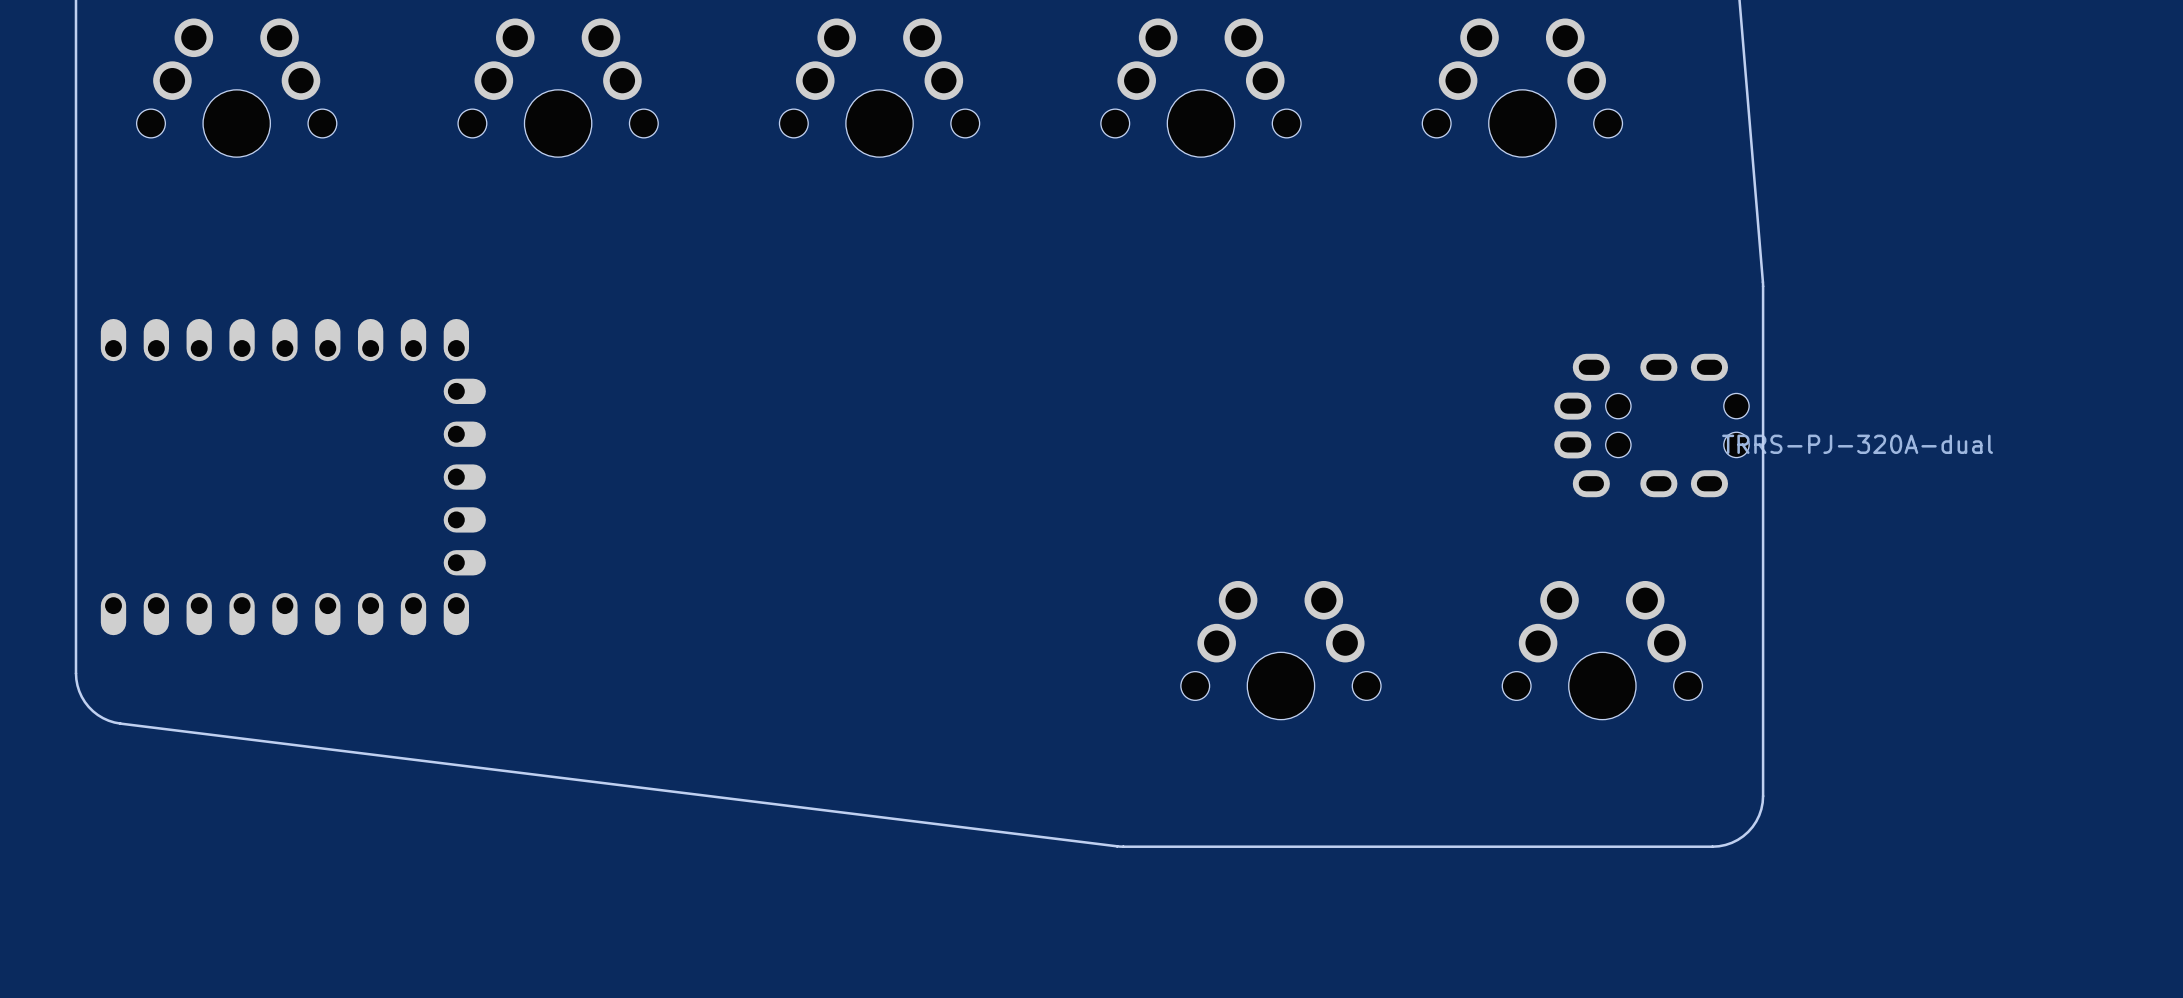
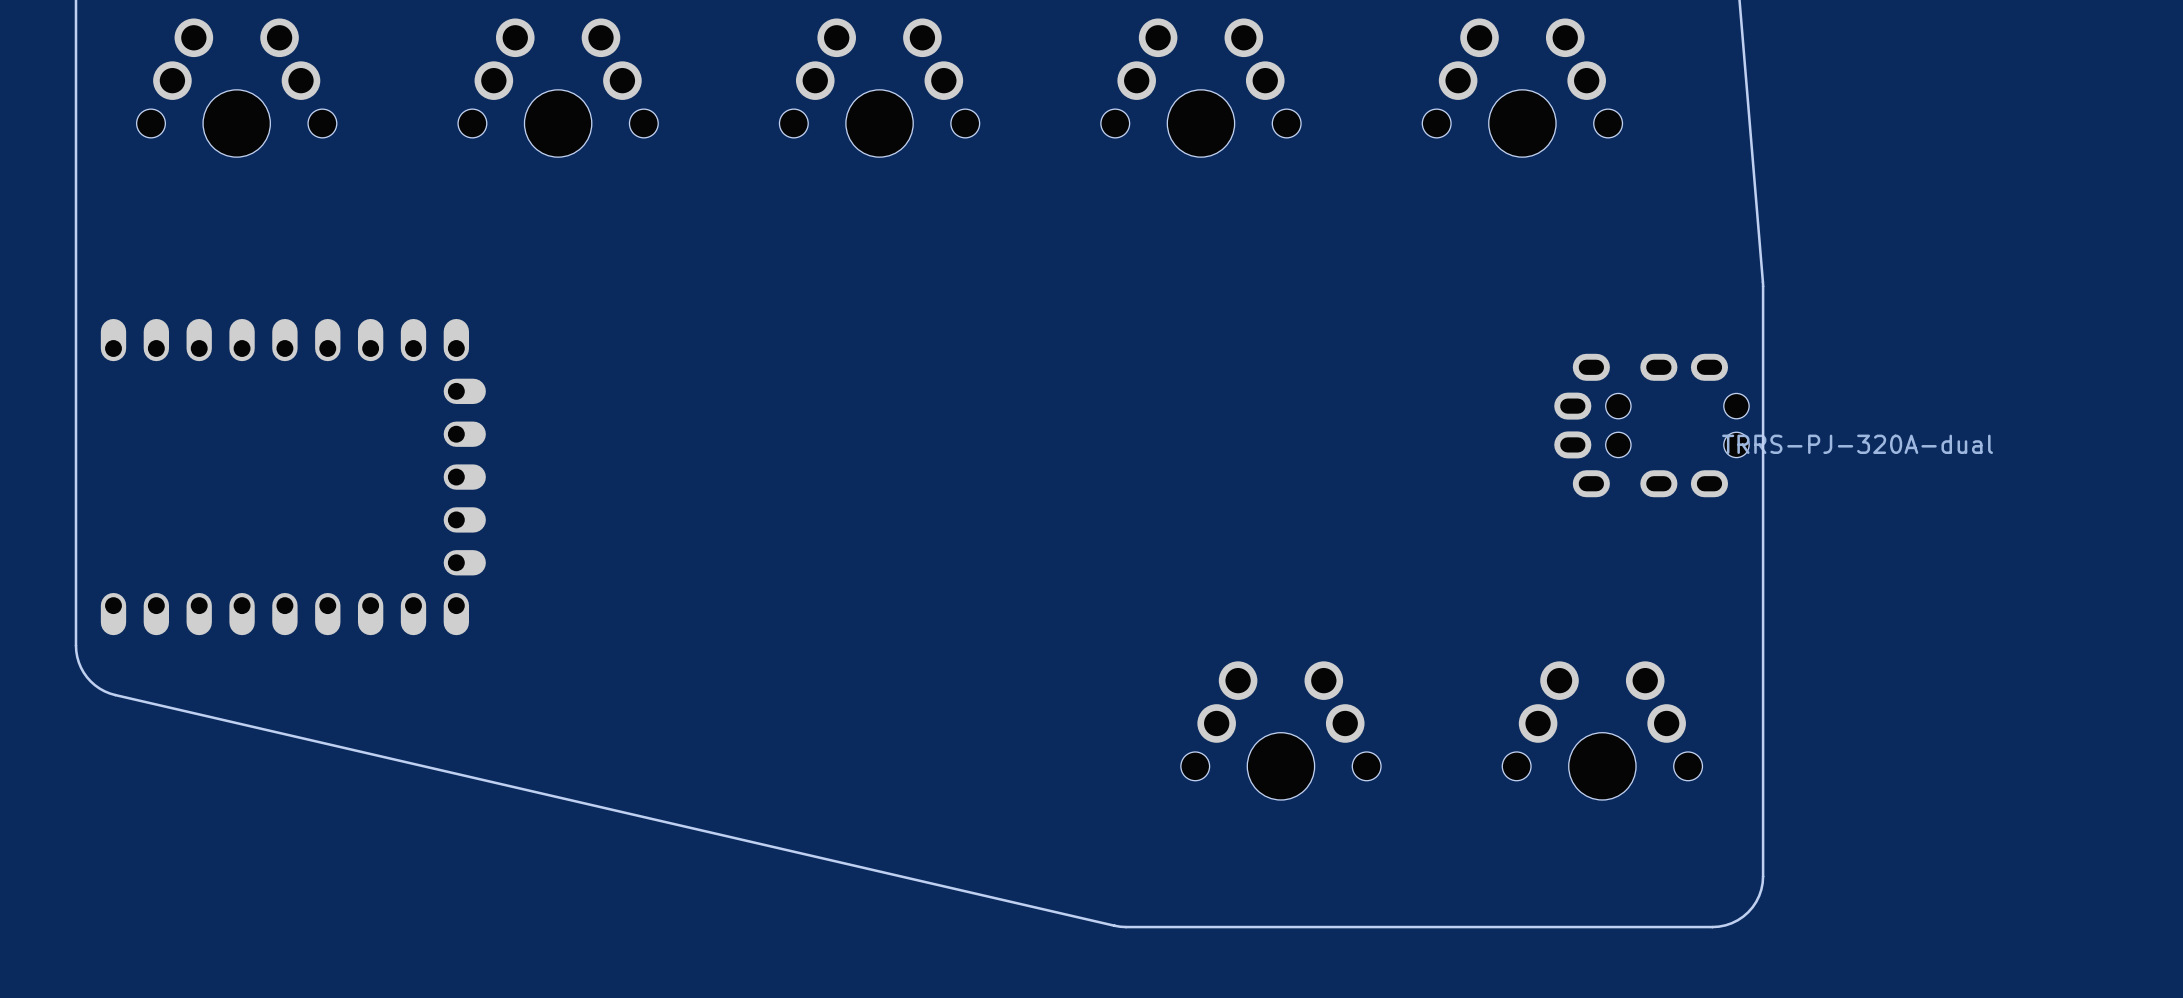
board edge: (75, 645) (76, 679) (81, 696) (97, 714) (114, 722) (1120, 846) (1719, 846) (1737, 839) (1752, 826) (1759, 815) (1763, 796) -> (75, 645) (78, 662) (87, 677) (99, 688) (115, 695) (1120, 926) (1712, 927) (1725, 925) (1737, 920) (1748, 912) (1756, 901) (1761, 889) (1763, 796)
part position: (1280, 650) -> (1280, 730)
part position: (1602, 650) -> (1602, 730)

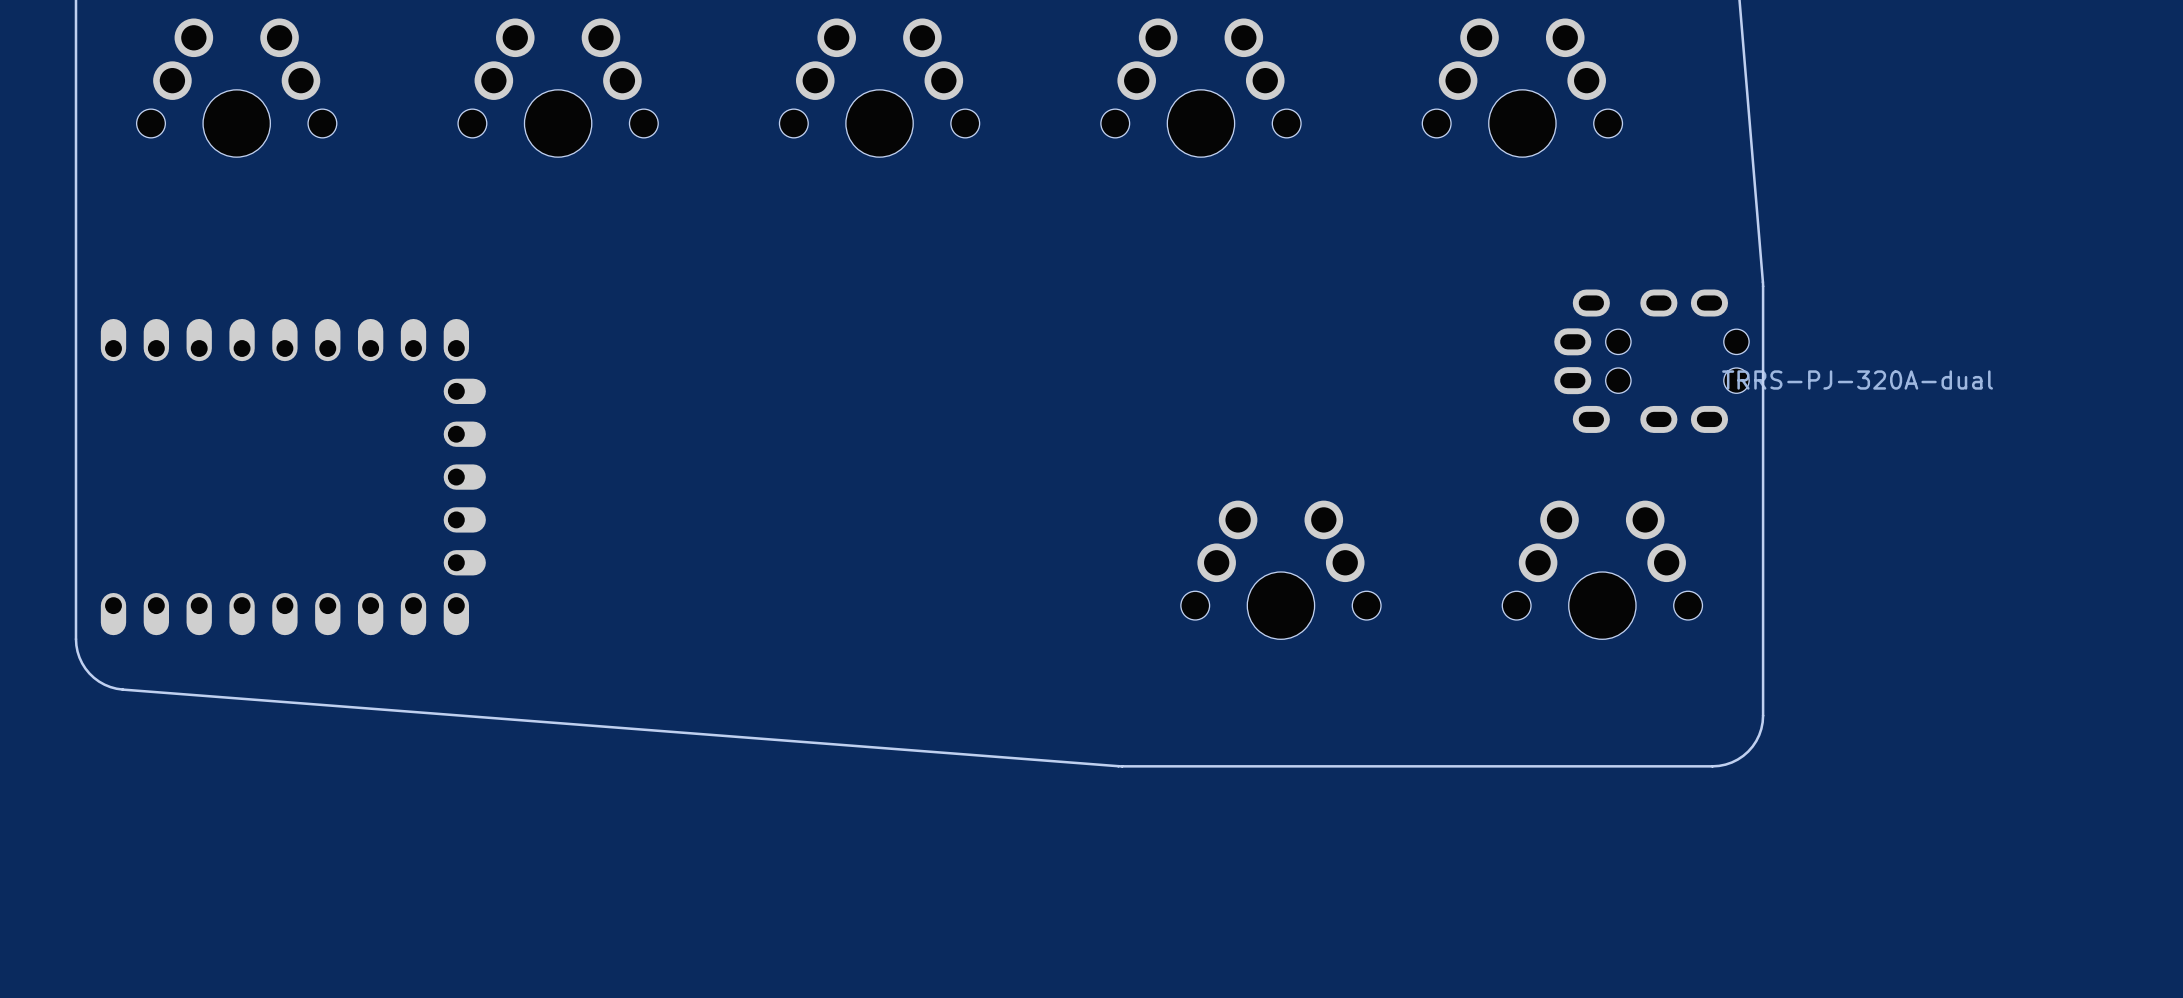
part position: (1651, 425) -> (1651, 361)
board edge: (75, 639) (77, 656) (83, 672) (99, 688) (115, 695) (1126, 927) (1712, 927) (1725, 925) (1743, 916) (1752, 907) (1759, 895) (1762, 883) (1763, 715) -> (75, 639) (79, 657) (89, 673) (104, 684) (122, 689) (1120, 766) (1719, 765) (1737, 759) (1752, 746) (1759, 735) (1763, 715)
part position: (1280, 730) -> (1280, 569)
part position: (1602, 730) -> (1602, 569)

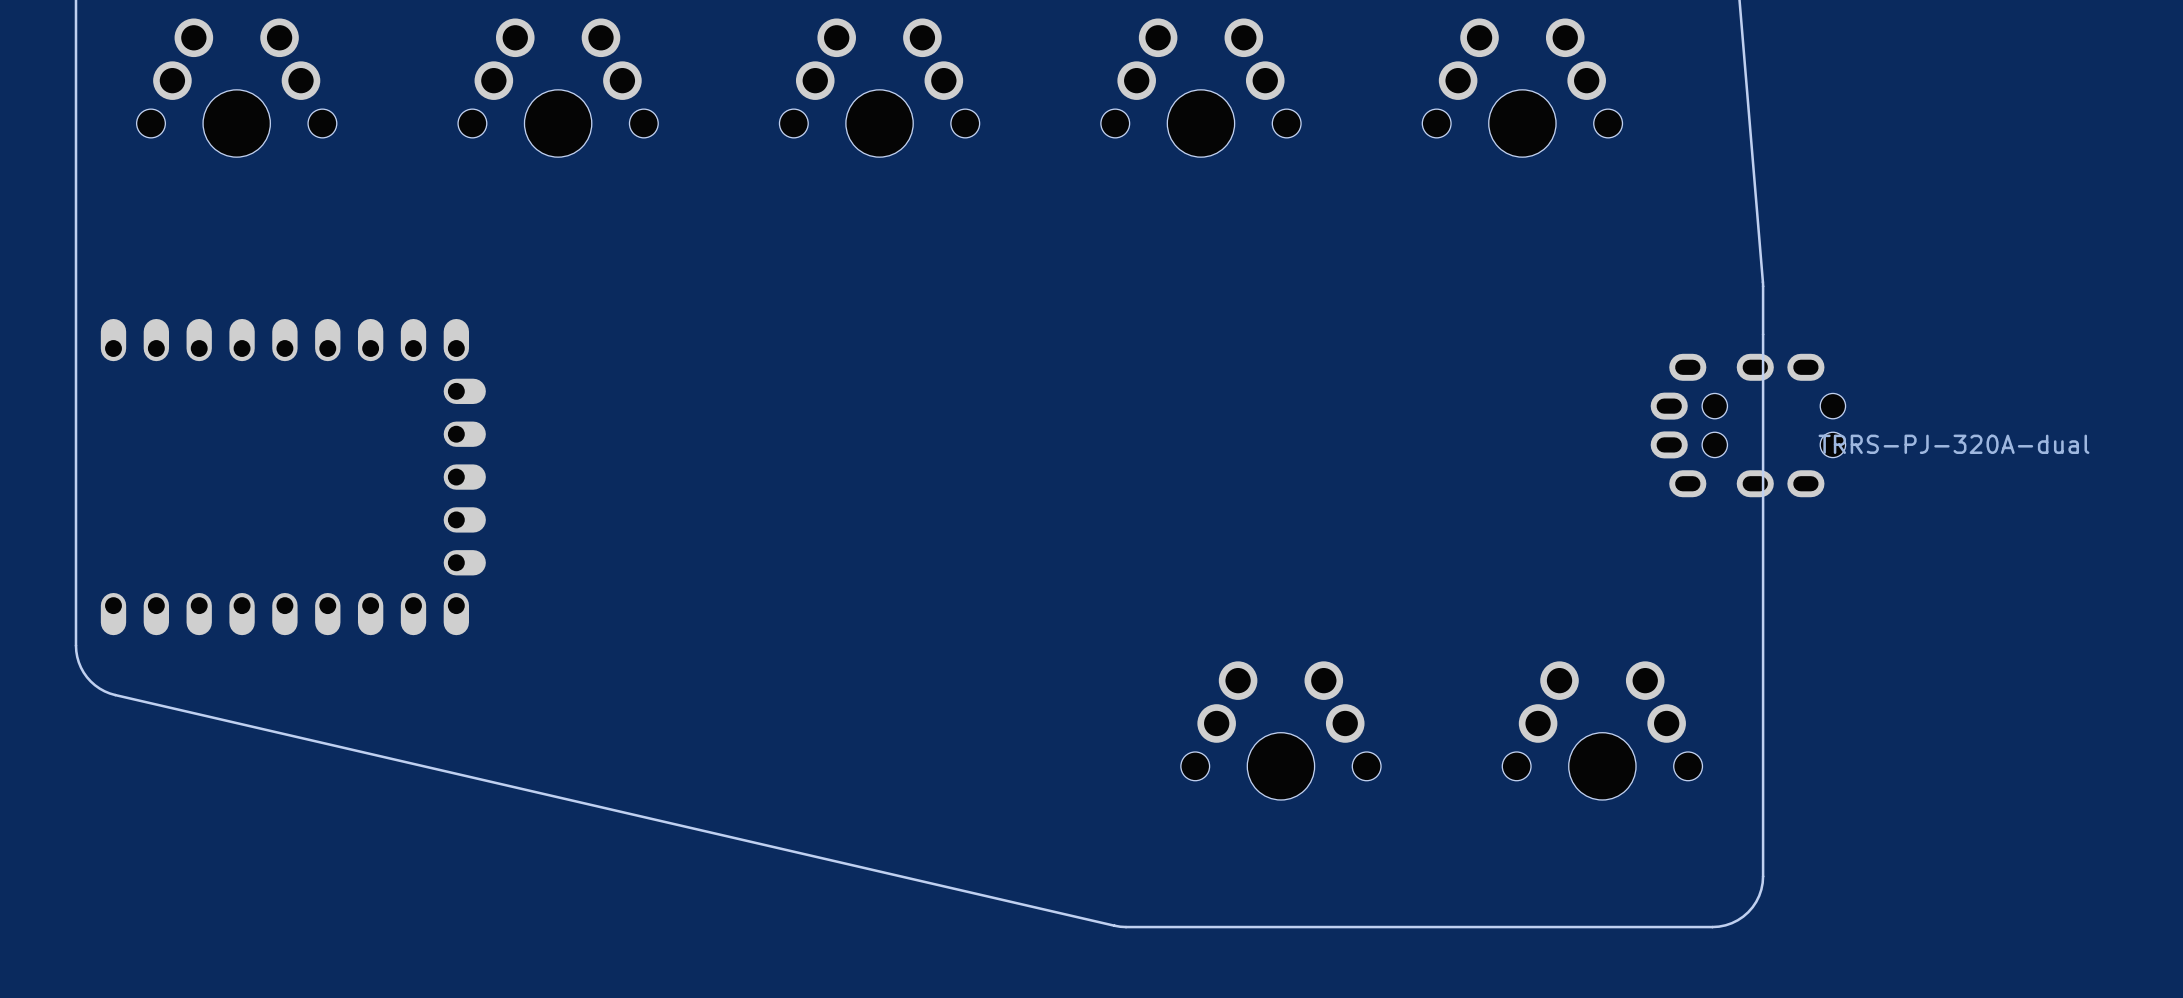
part position: (1651, 361) -> (1748, 425)
part position: (1280, 569) -> (1280, 730)
part position: (1602, 569) -> (1602, 730)
board edge: (75, 639) (79, 657) (89, 673) (104, 684) (122, 689) (1120, 766) (1719, 765) (1737, 759) (1752, 746) (1759, 735) (1763, 715) -> (75, 639) (77, 656) (83, 672) (99, 688) (115, 695) (1126, 927) (1712, 927) (1725, 925) (1743, 916) (1752, 907) (1759, 895) (1762, 883) (1763, 715)

